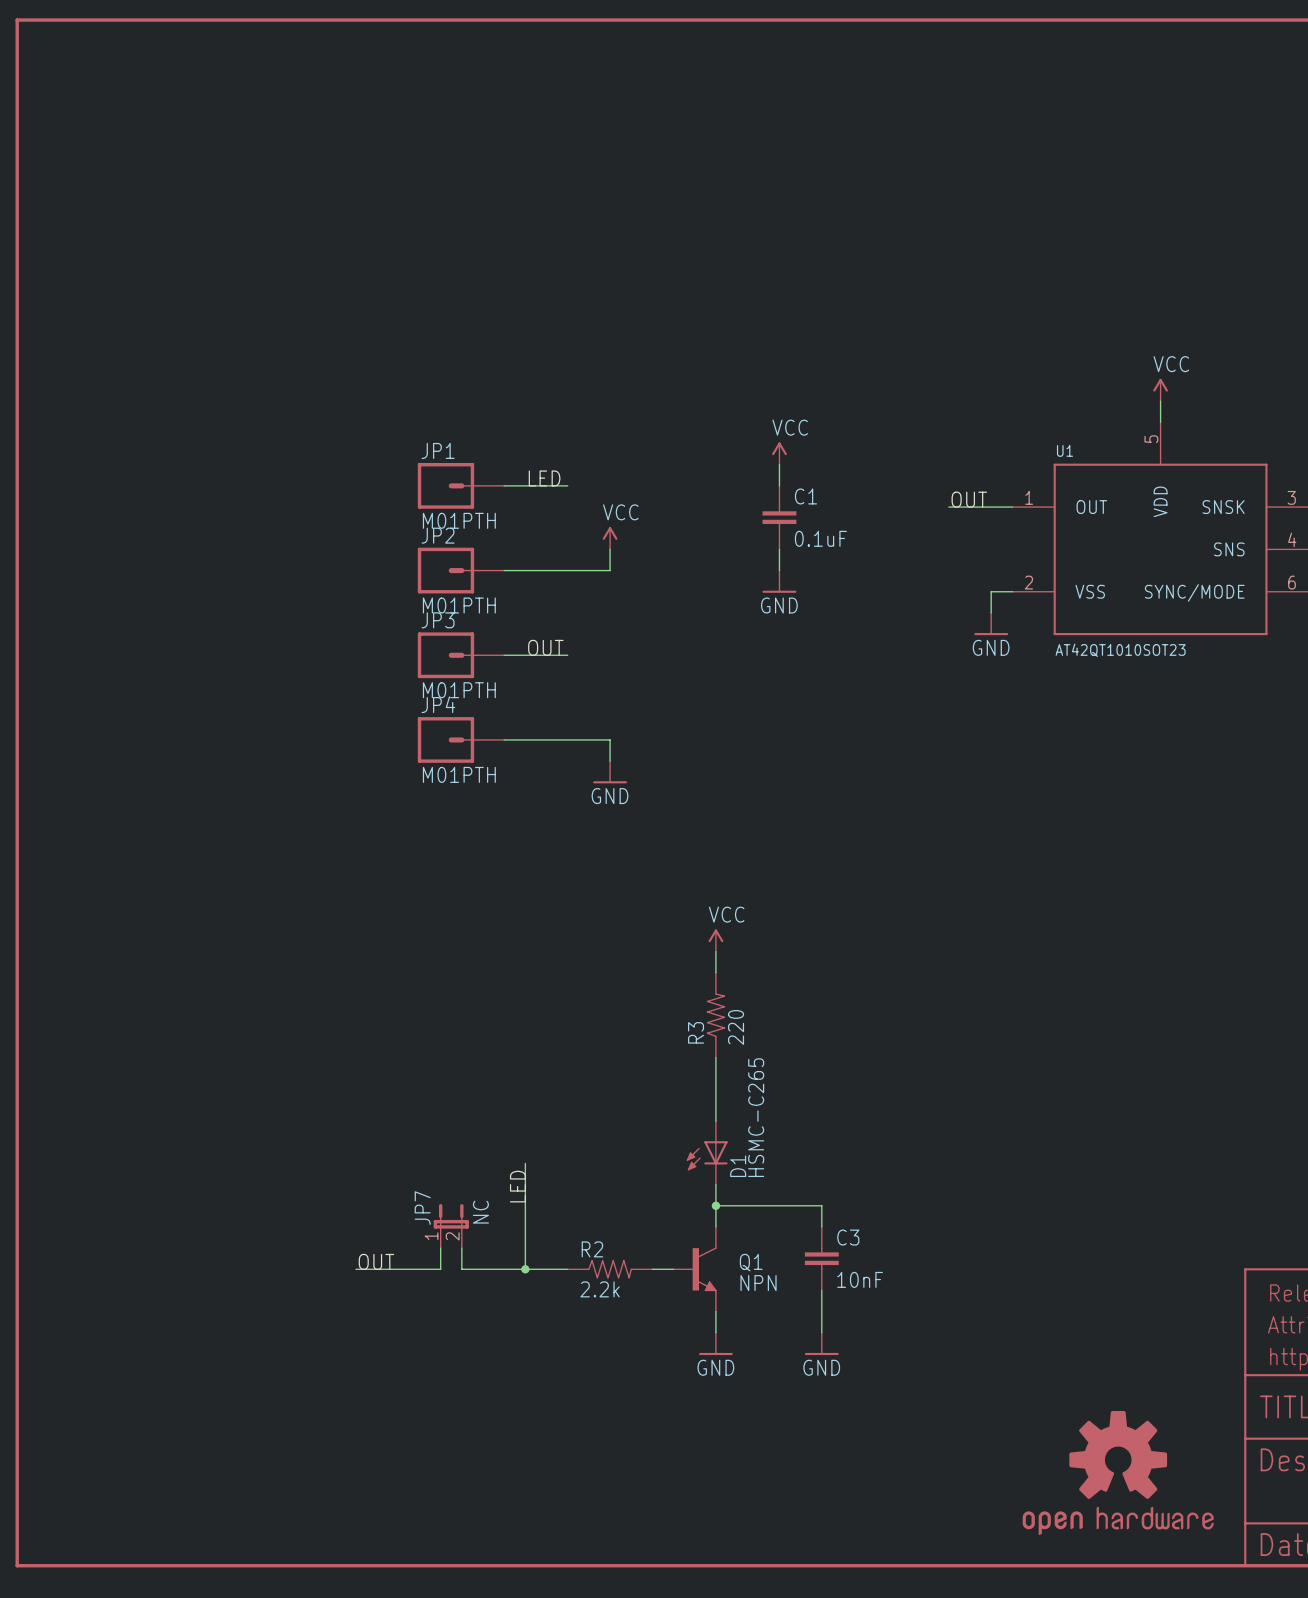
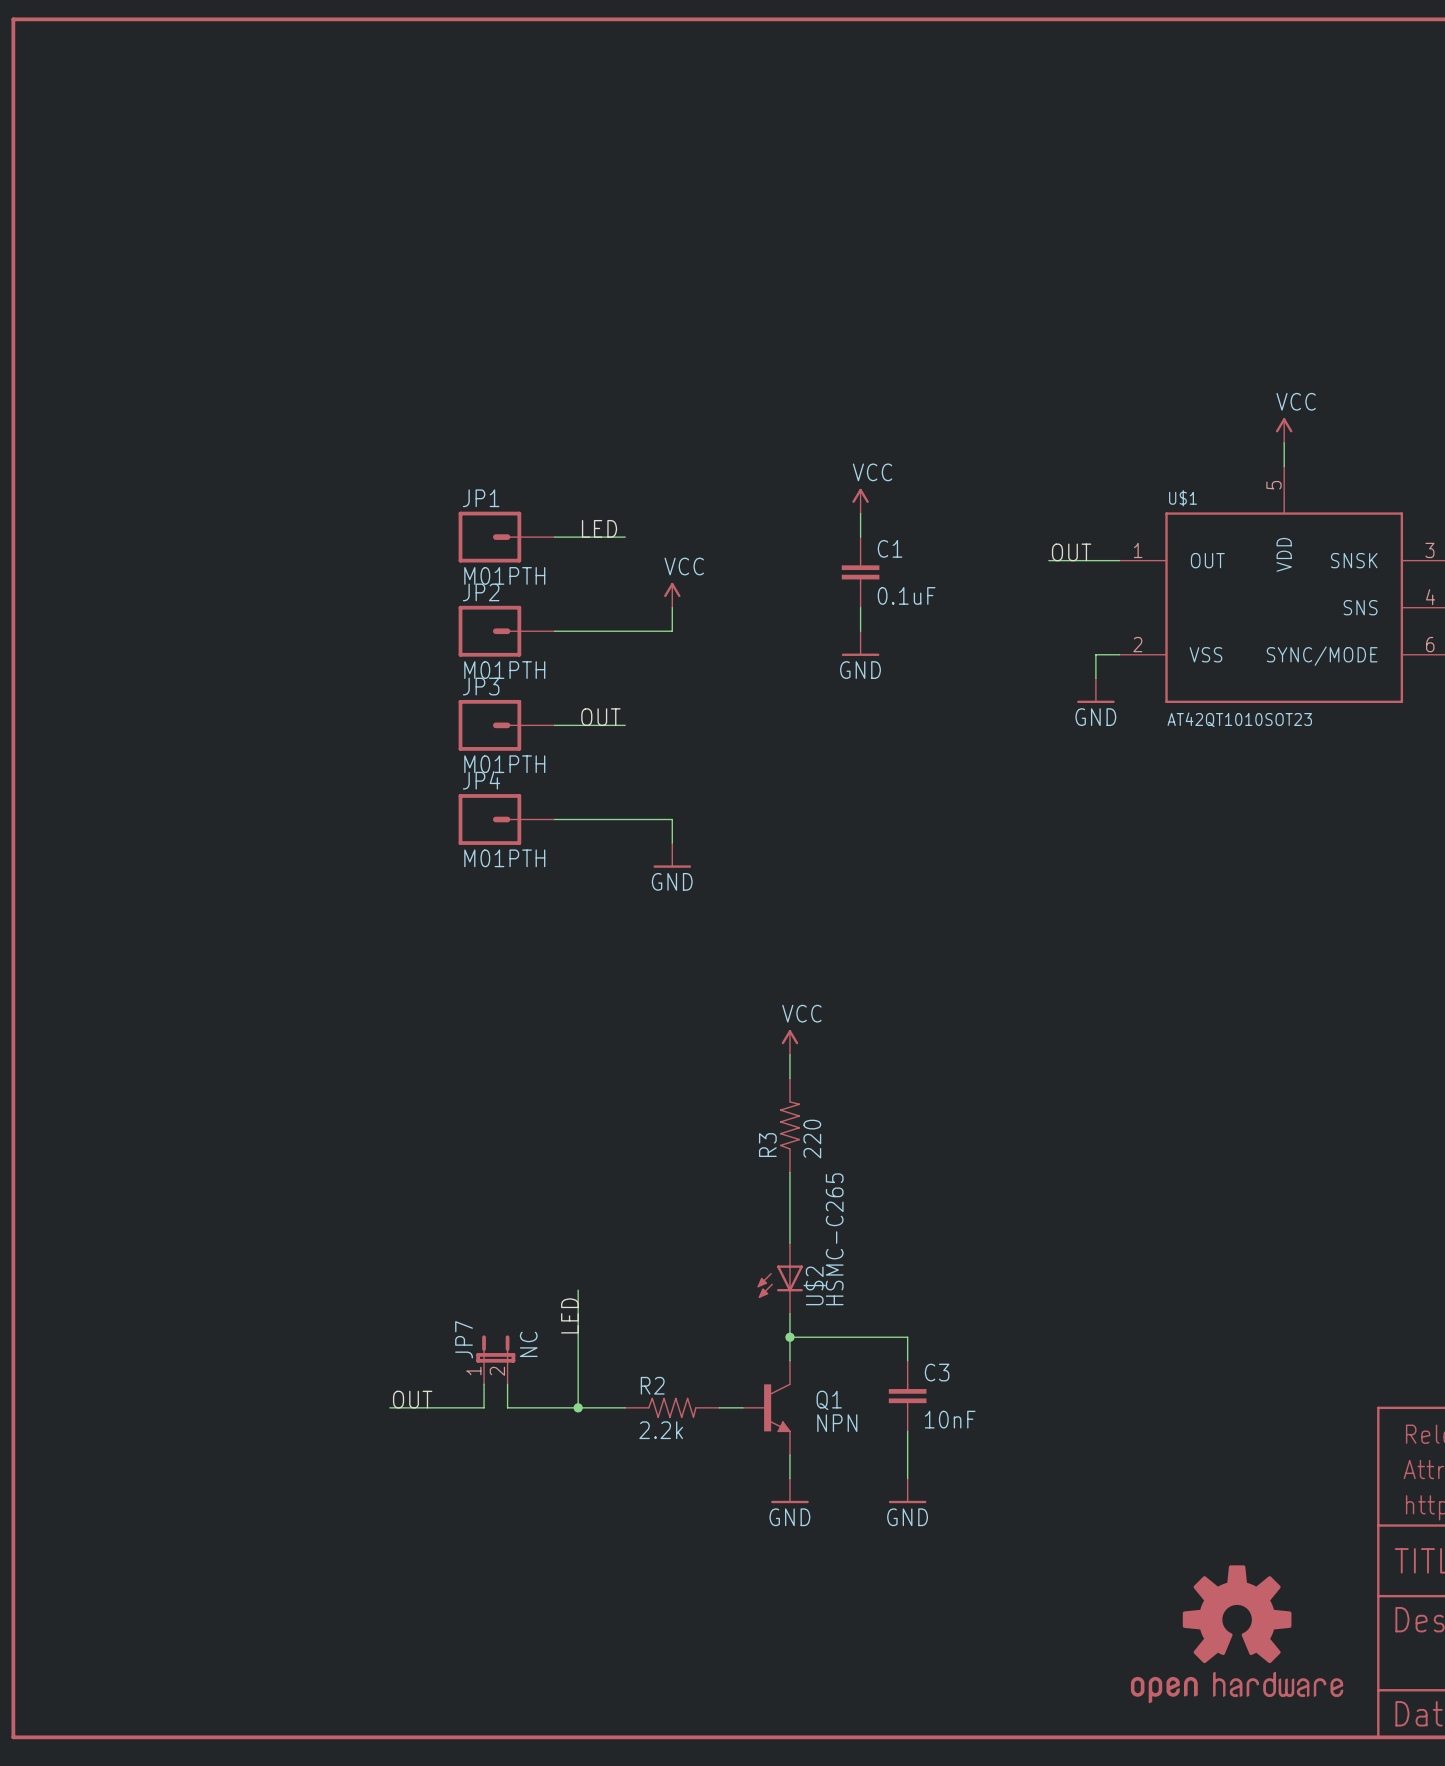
U1 name: U1 (1065, 450) -> U$1 (1183, 498)
D1 name: D1 (738, 1166) -> U$2 (814, 1285)

